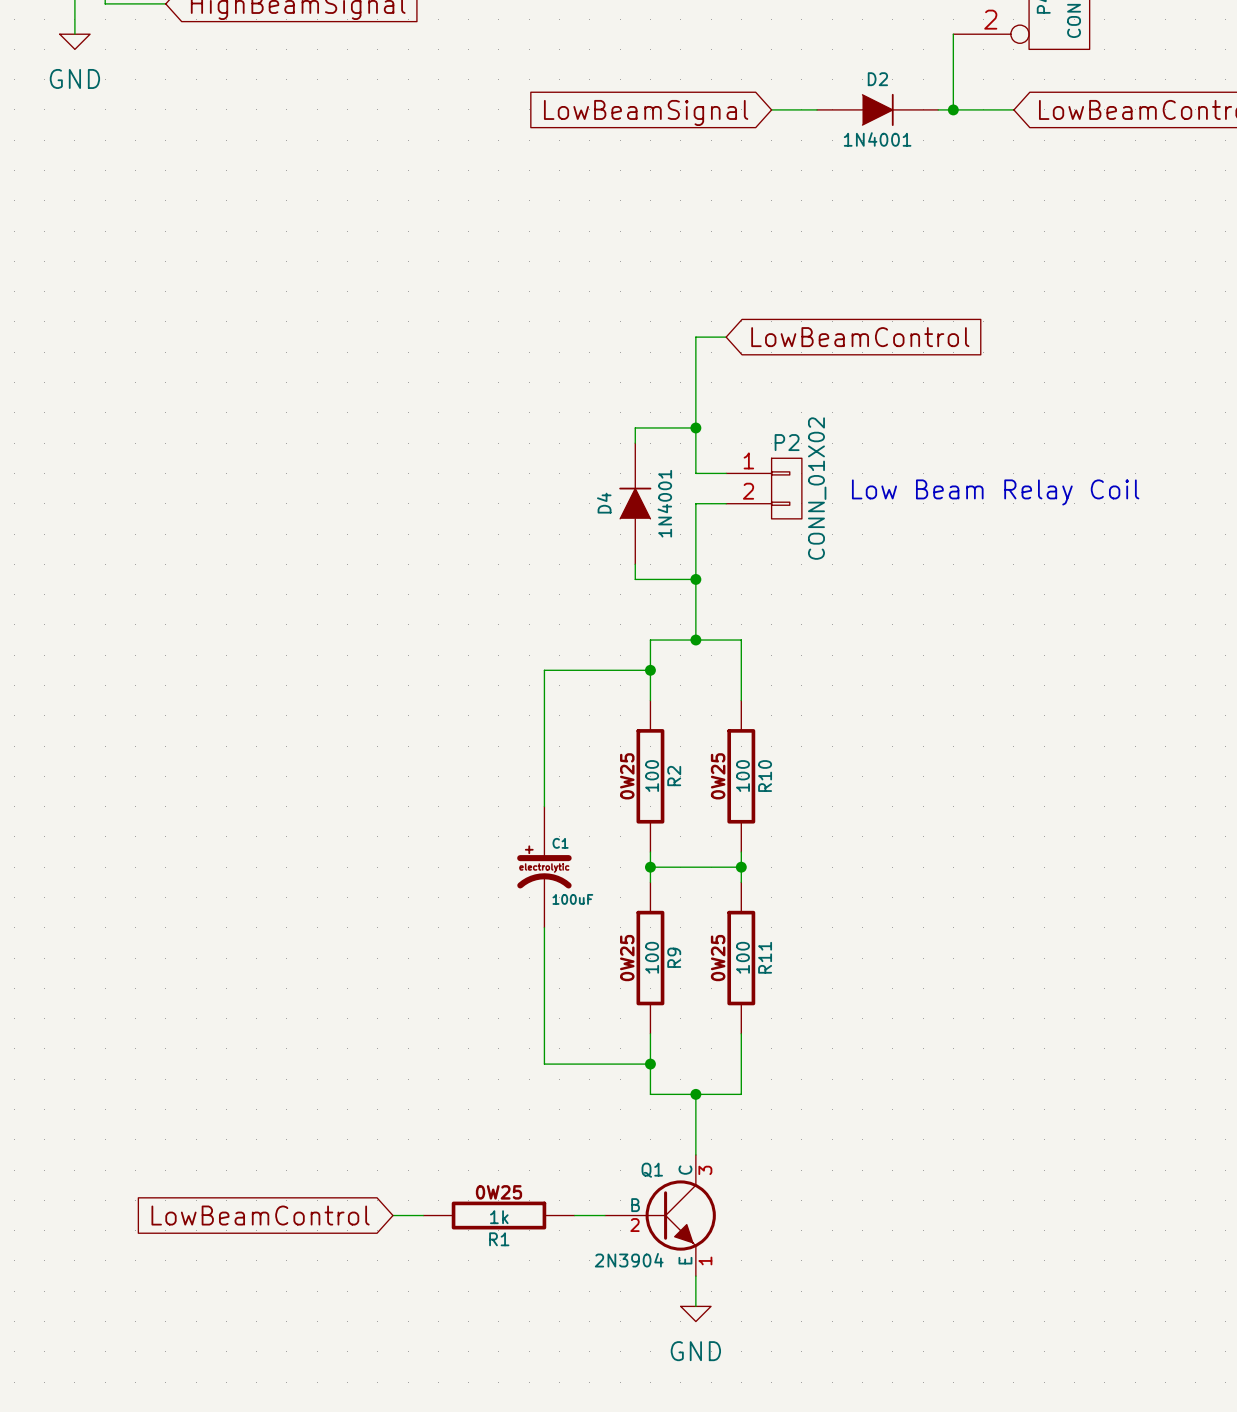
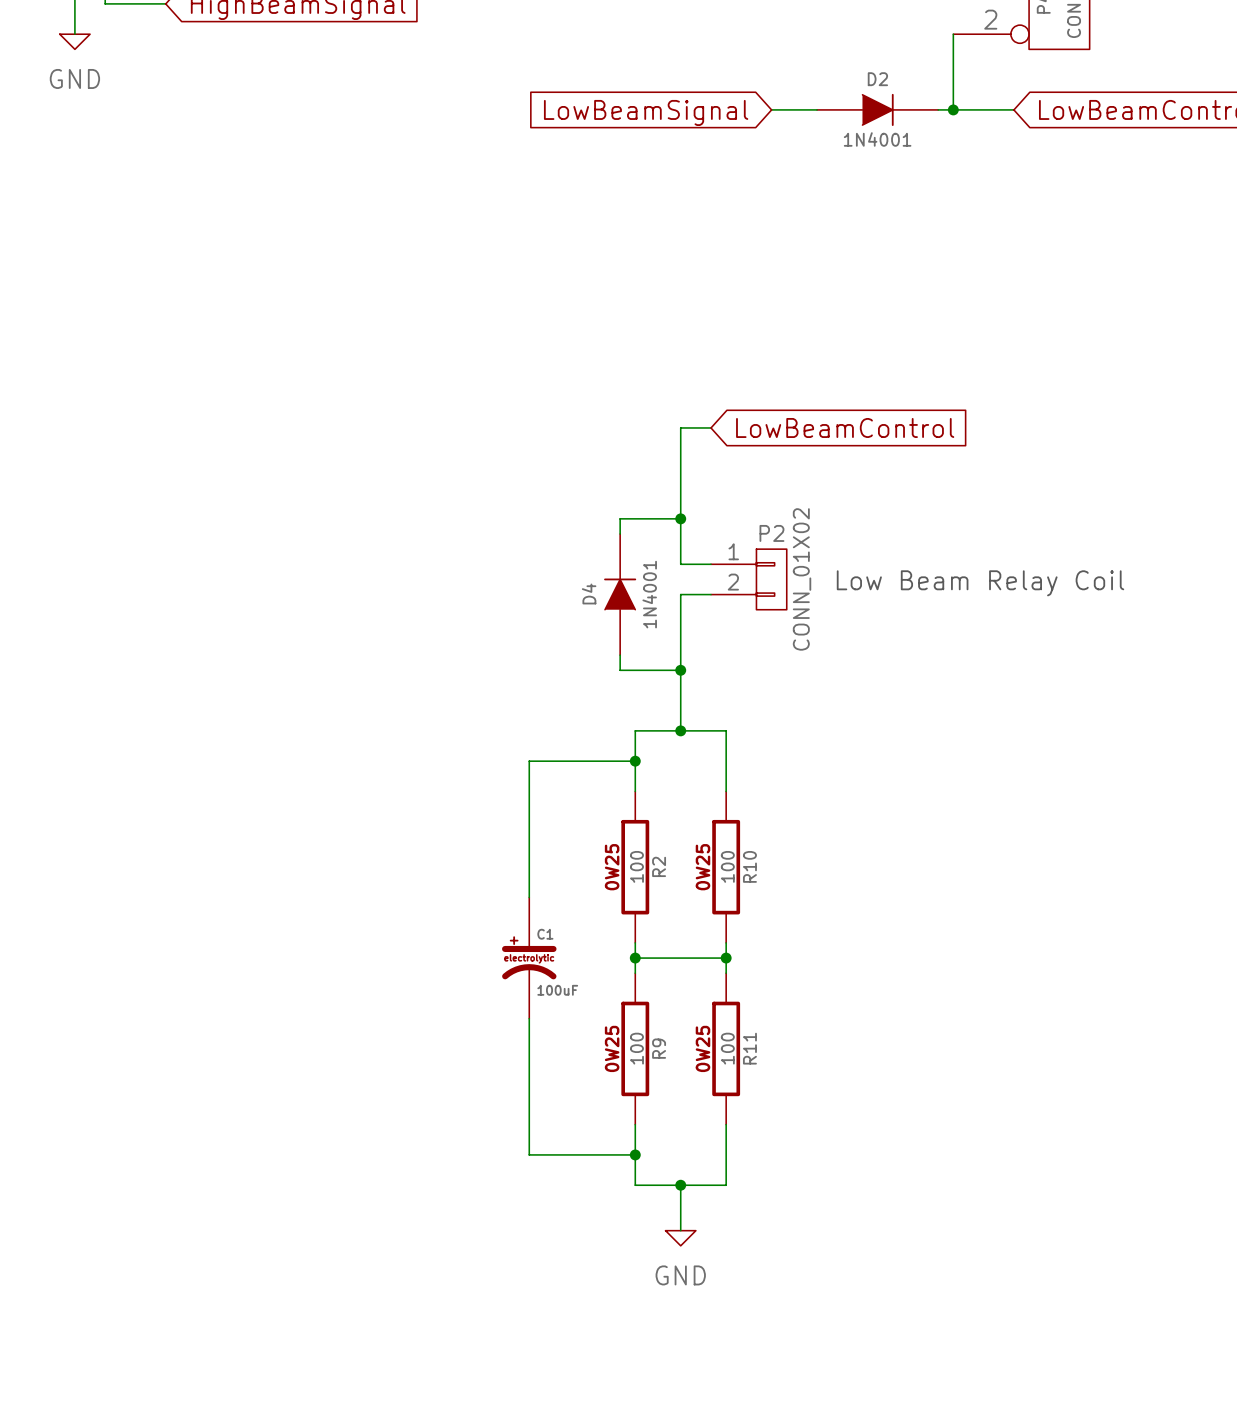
wire: (726, 337) (695, 337) (695, 473) (726, 473) -> none
global label position: LowBeamControl (860, 337) -> LowBeamControl (845, 427)
wire: (680, 427) (635, 427) (635, 443) -> (680, 427) (680, 564) (711, 564)
wire: none -> (695, 427) (711, 427)
junction: (695, 427) -> none
P2 position: (764, 488) -> (748, 579)
text position: Low Beam Relay Coil (995, 492) -> Low Beam Relay Coil (980, 583)
D4 position: (635, 503) -> (620, 594)
wire: (726, 503) (695, 503) (695, 640) -> (711, 594) (680, 594) (680, 730)
wire: none -> (680, 518) (620, 518) (620, 534)
junction: none -> (680, 518)
wire: (635, 564) (635, 579) (695, 579) -> none
junction: (695, 579) -> none
junction: (695, 640) -> none
wire: (620, 670) (544, 670) (544, 806) -> (620, 670) (620, 655)
wire: none -> (650, 670) (680, 670)
junction: (650, 670) -> none
junction: none -> (680, 670)
wire: (650, 700) (650, 640) (741, 640) (741, 700) -> (635, 791) (635, 730) (726, 730) (726, 791)
junction: none -> (680, 730)
wire: none -> (635, 761) (529, 761) (529, 897)
junction: none -> (635, 761)
R2 position: (650, 776) -> (635, 867)
R10 position: (741, 776) -> (726, 867)
wire: (650, 852) (650, 882) -> (635, 942) (635, 973)
wire: (741, 852) (741, 882) -> (726, 942) (726, 973)
C1 position: (544, 867) -> (529, 958)
wire: (650, 867) (741, 867) -> (635, 958) (726, 958)
junction: (650, 867) -> none
junction: (741, 867) -> none
wire: (544, 927) (544, 1064) (650, 1064) -> (529, 1018) (529, 1154) (635, 1154)
junction: none -> (635, 958)
R9 position: (650, 958) -> (635, 1048)
junction: none -> (726, 958)
R11 position: (741, 958) -> (726, 1048)
wire: (650, 1033) (650, 1094) (741, 1094) (741, 1033) -> (635, 1124) (635, 1185) (726, 1185) (726, 1124)
junction: (650, 1064) -> none
wire: (695, 1094) (695, 1154) -> none
junction: (695, 1094) -> none
junction: none -> (635, 1154)
wire: none -> (680, 1185) (680, 1230)
junction: none -> (680, 1185)
global label: LowBeamControl (260, 1215) -> none
wire: (392, 1215) (423, 1215) -> none
R1: 1k (498, 1215) -> none
wire: (574, 1215) (605, 1215) -> none
Q1: 2N3904 (660, 1215) -> none
wire: (695, 1276) (695, 1306) -> none
power symbol position: GND (695, 1313) -> GND (680, 1238)

